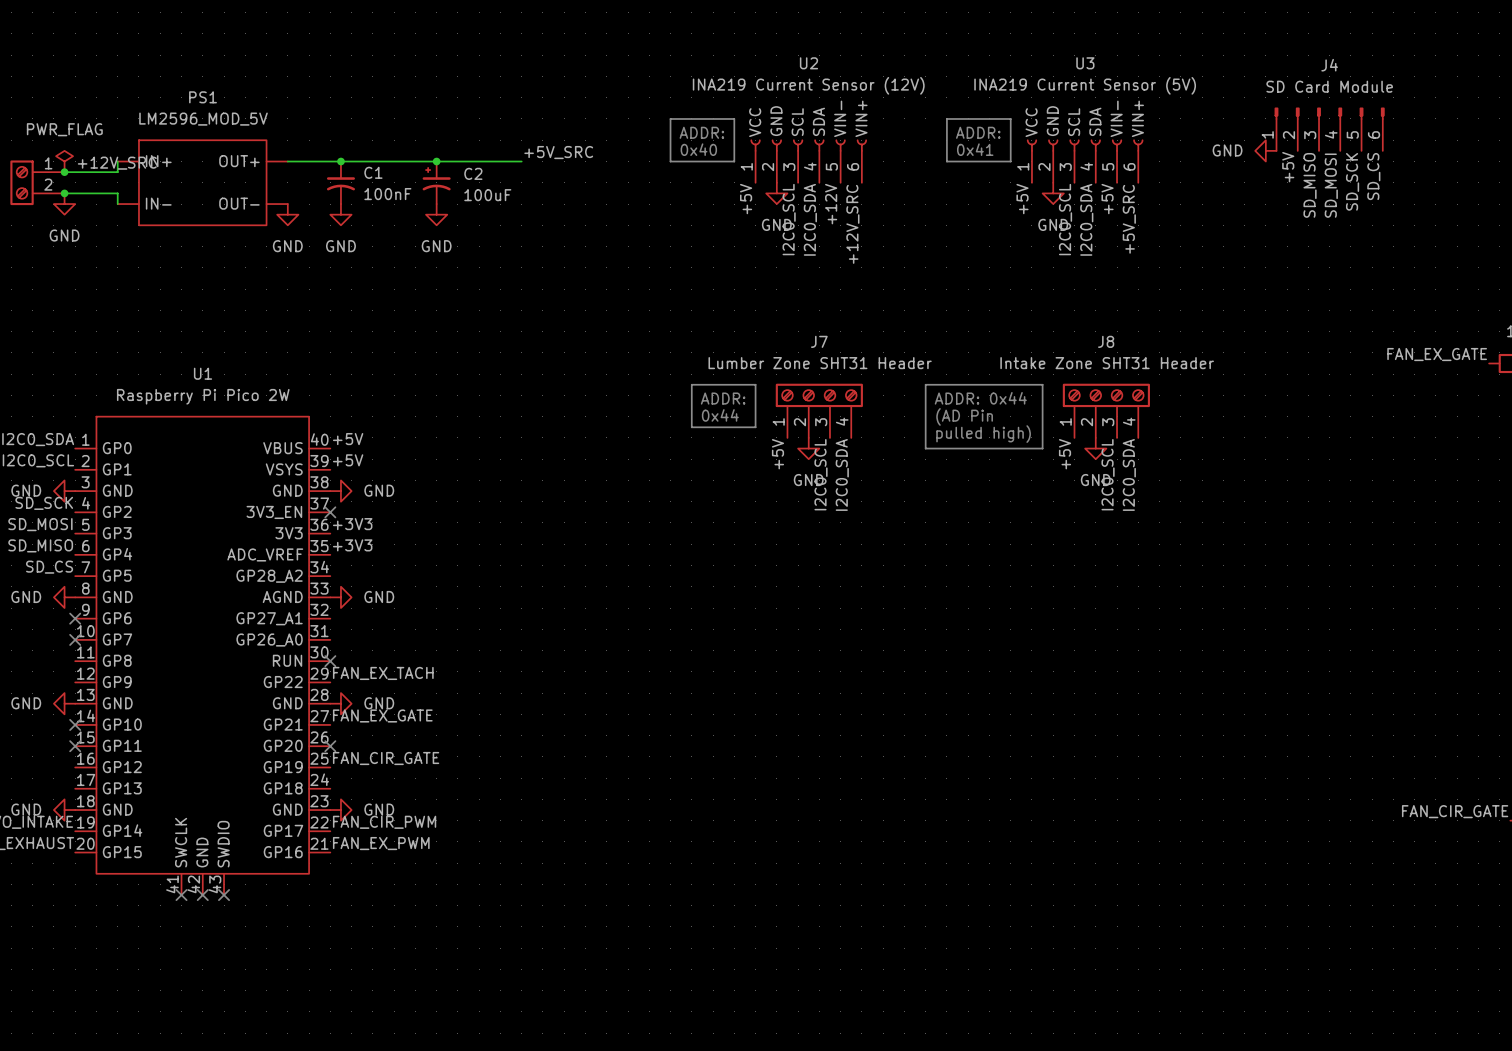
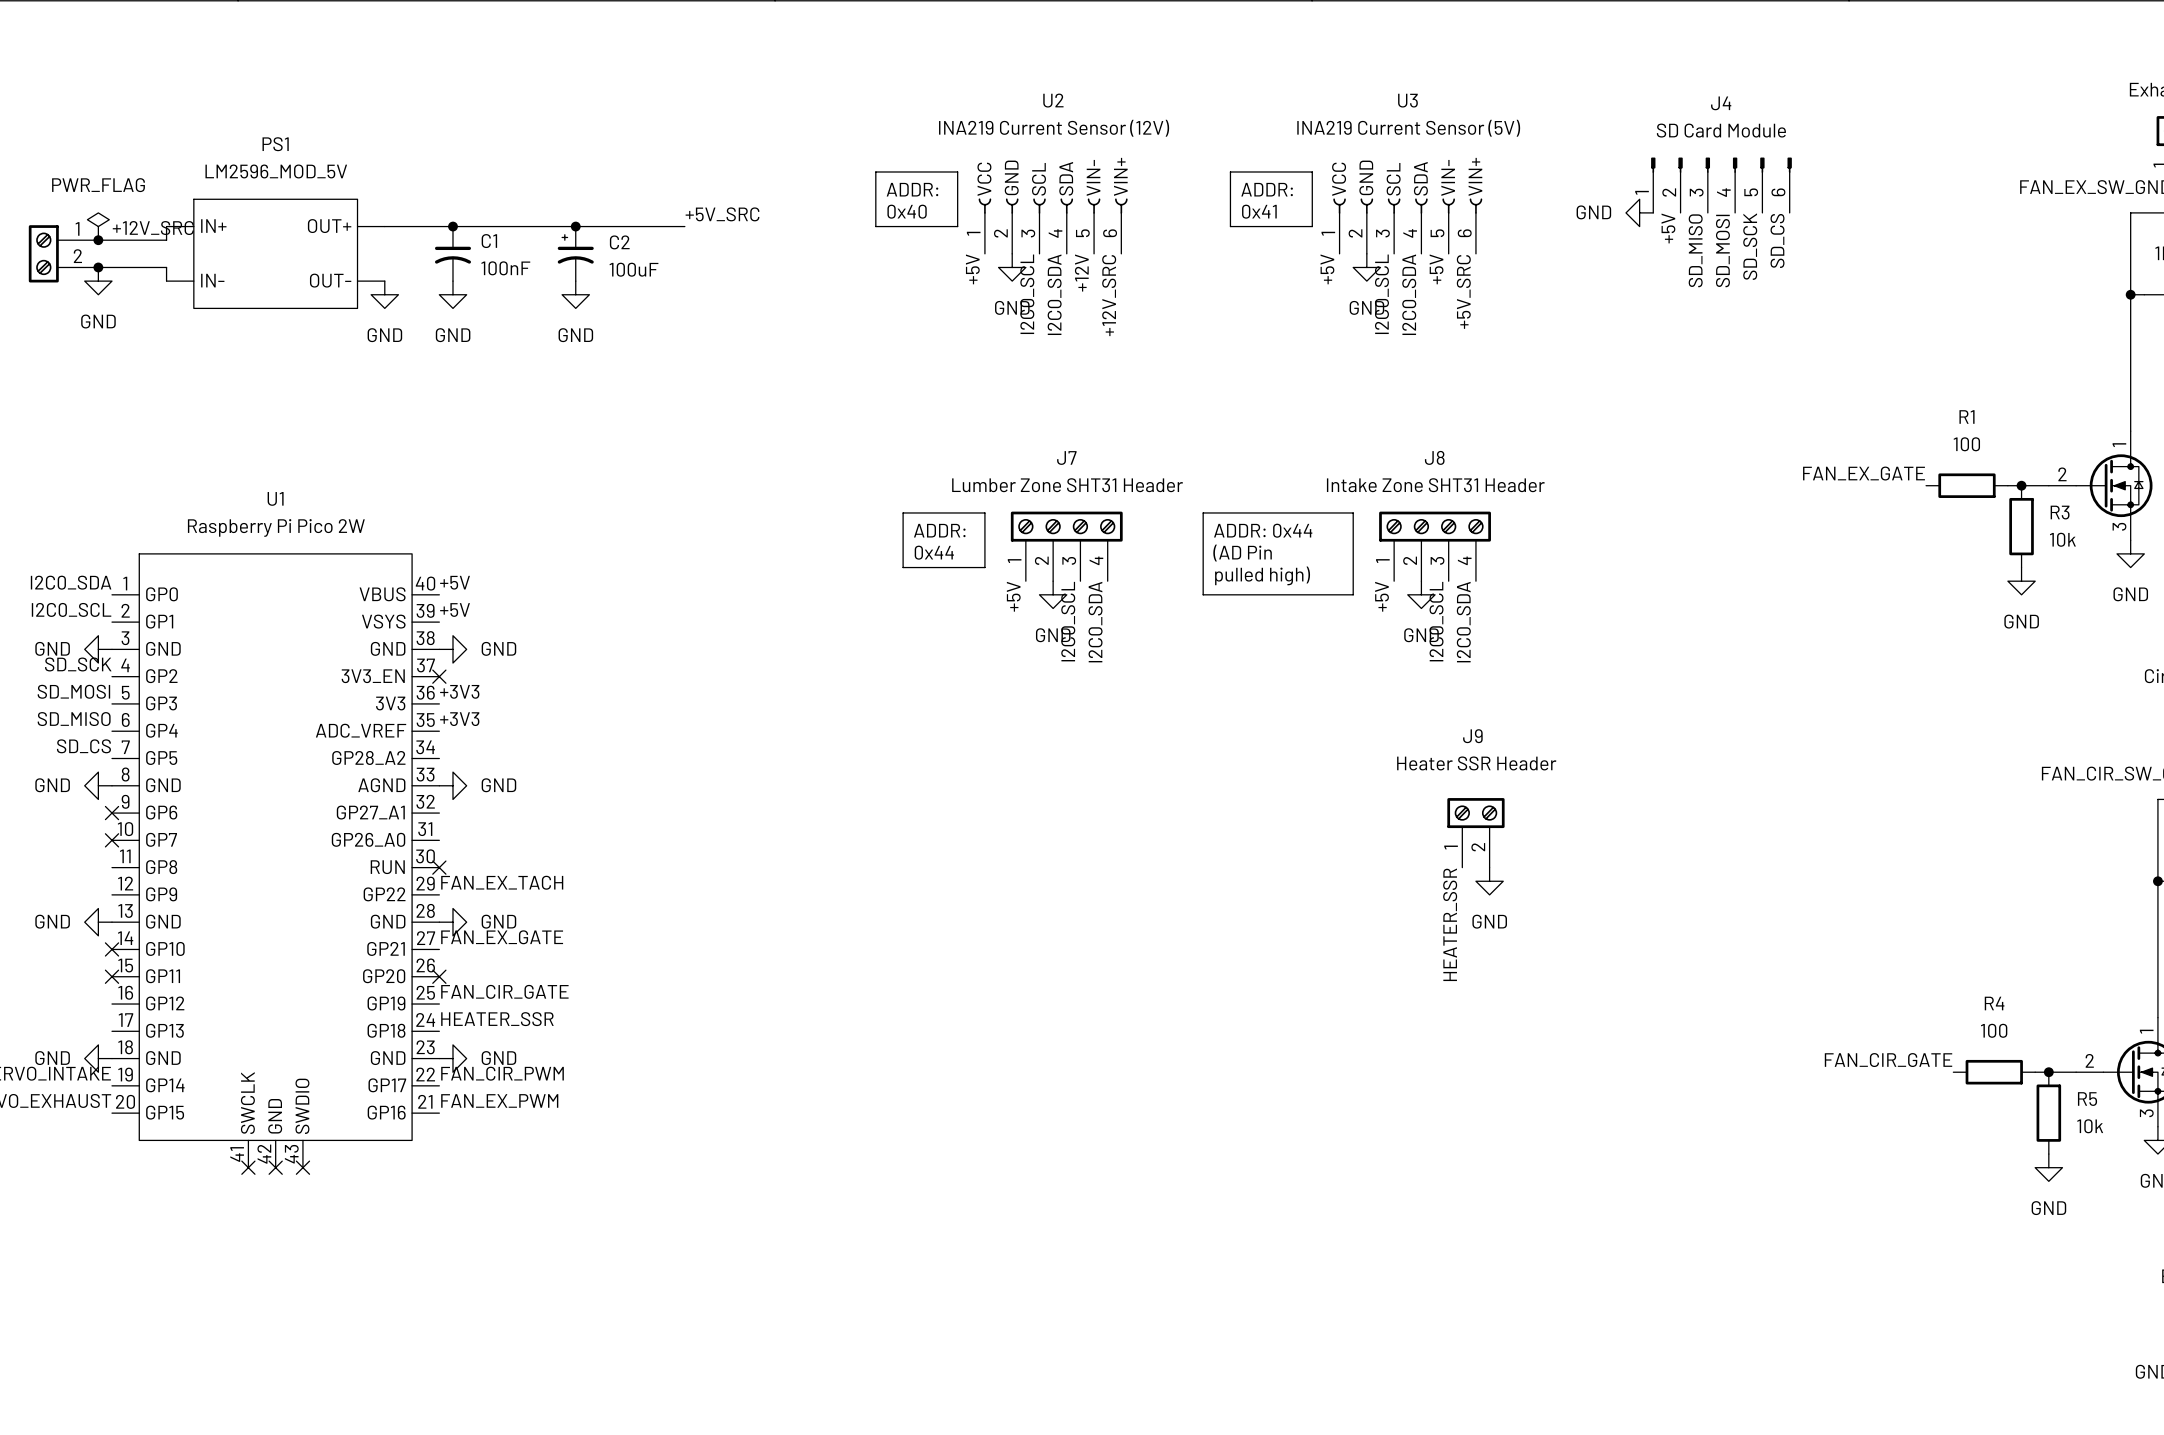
J9: none -> Heater SSR Header (1475, 832)
power symbol: none -> GND (1489, 881)
label: none -> HEATER_SSR (1450, 924)
label: none -> HEATER_SSR (497, 1019)

